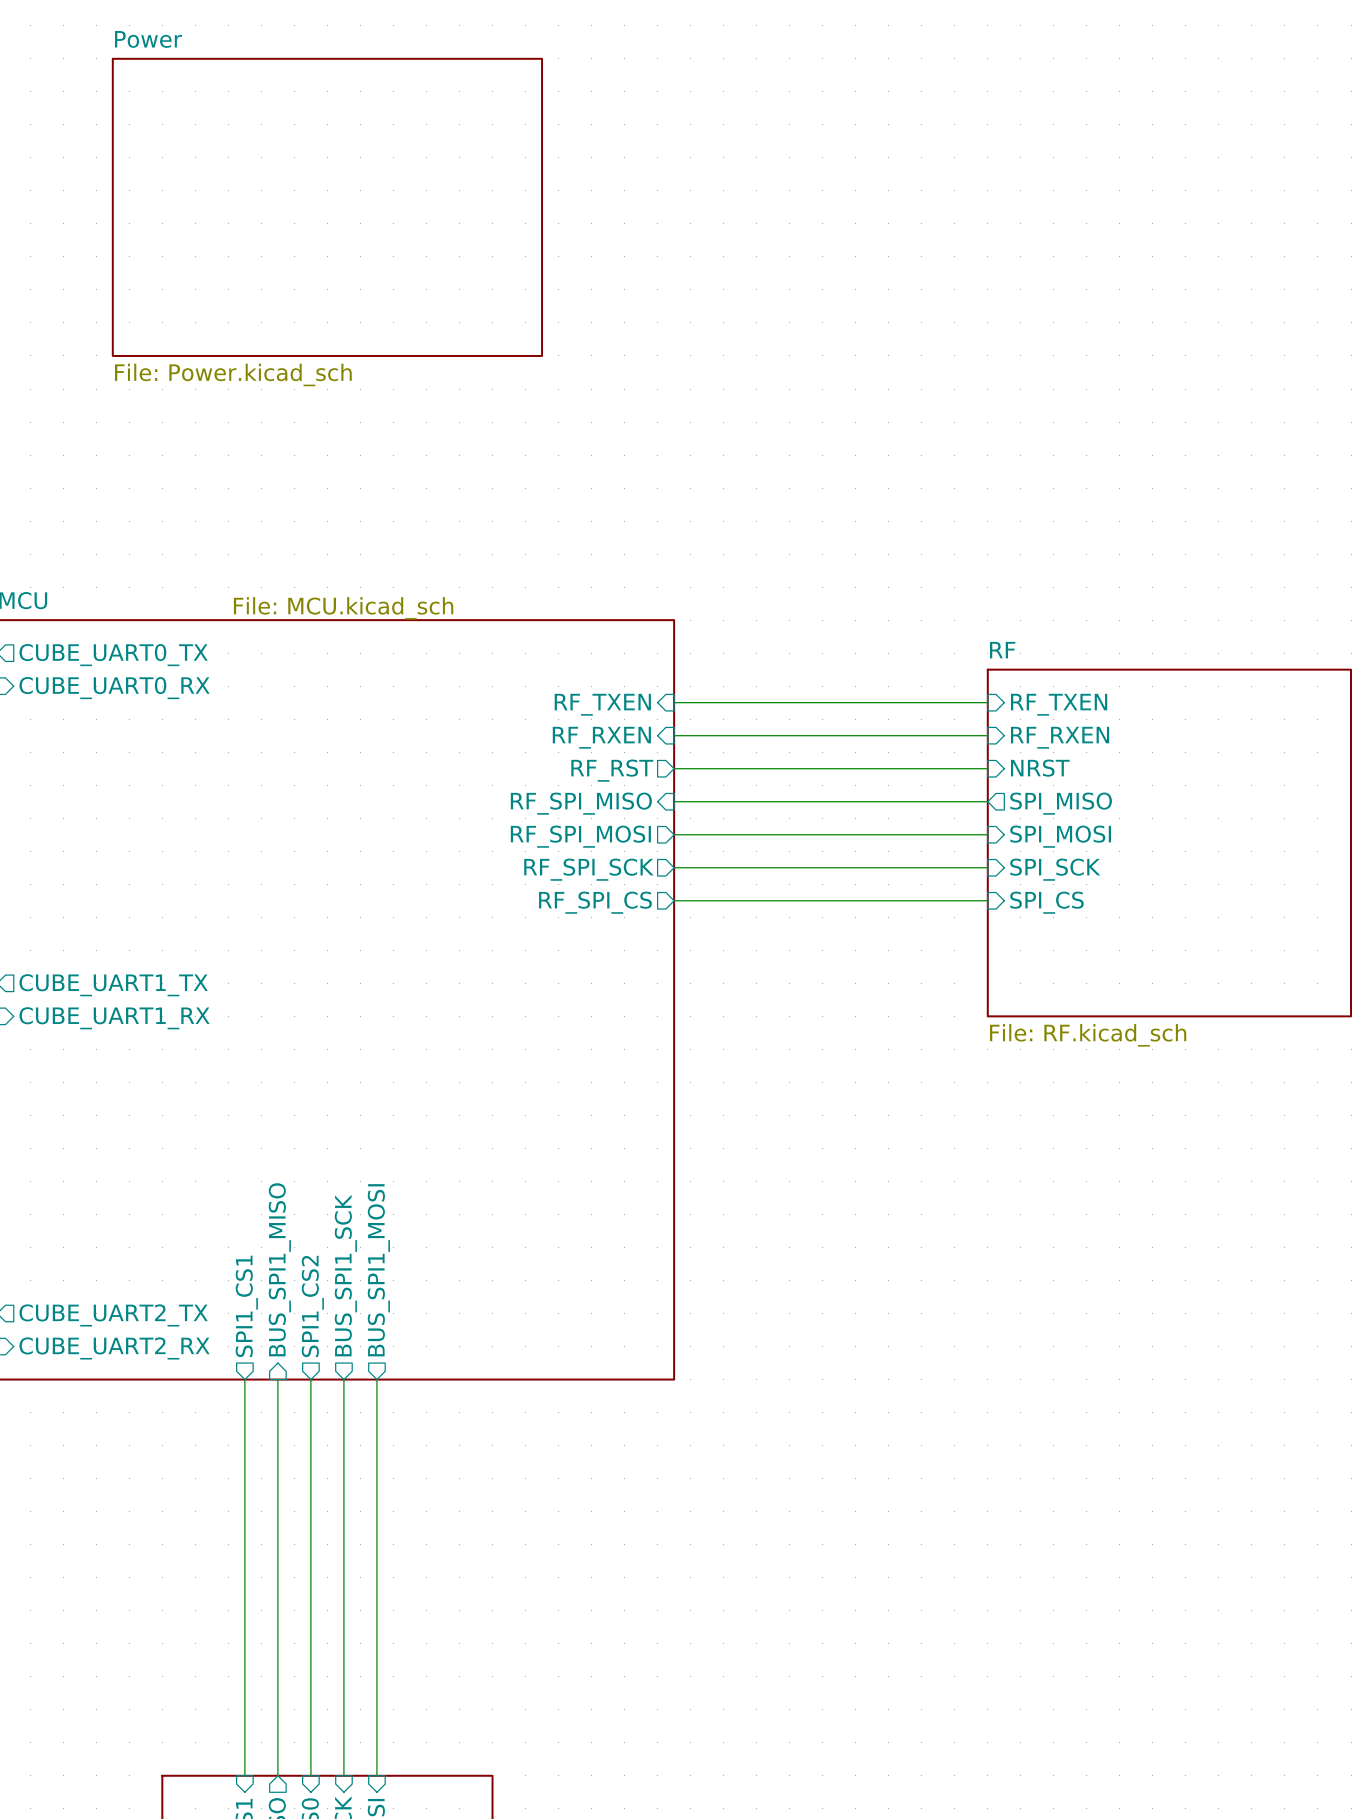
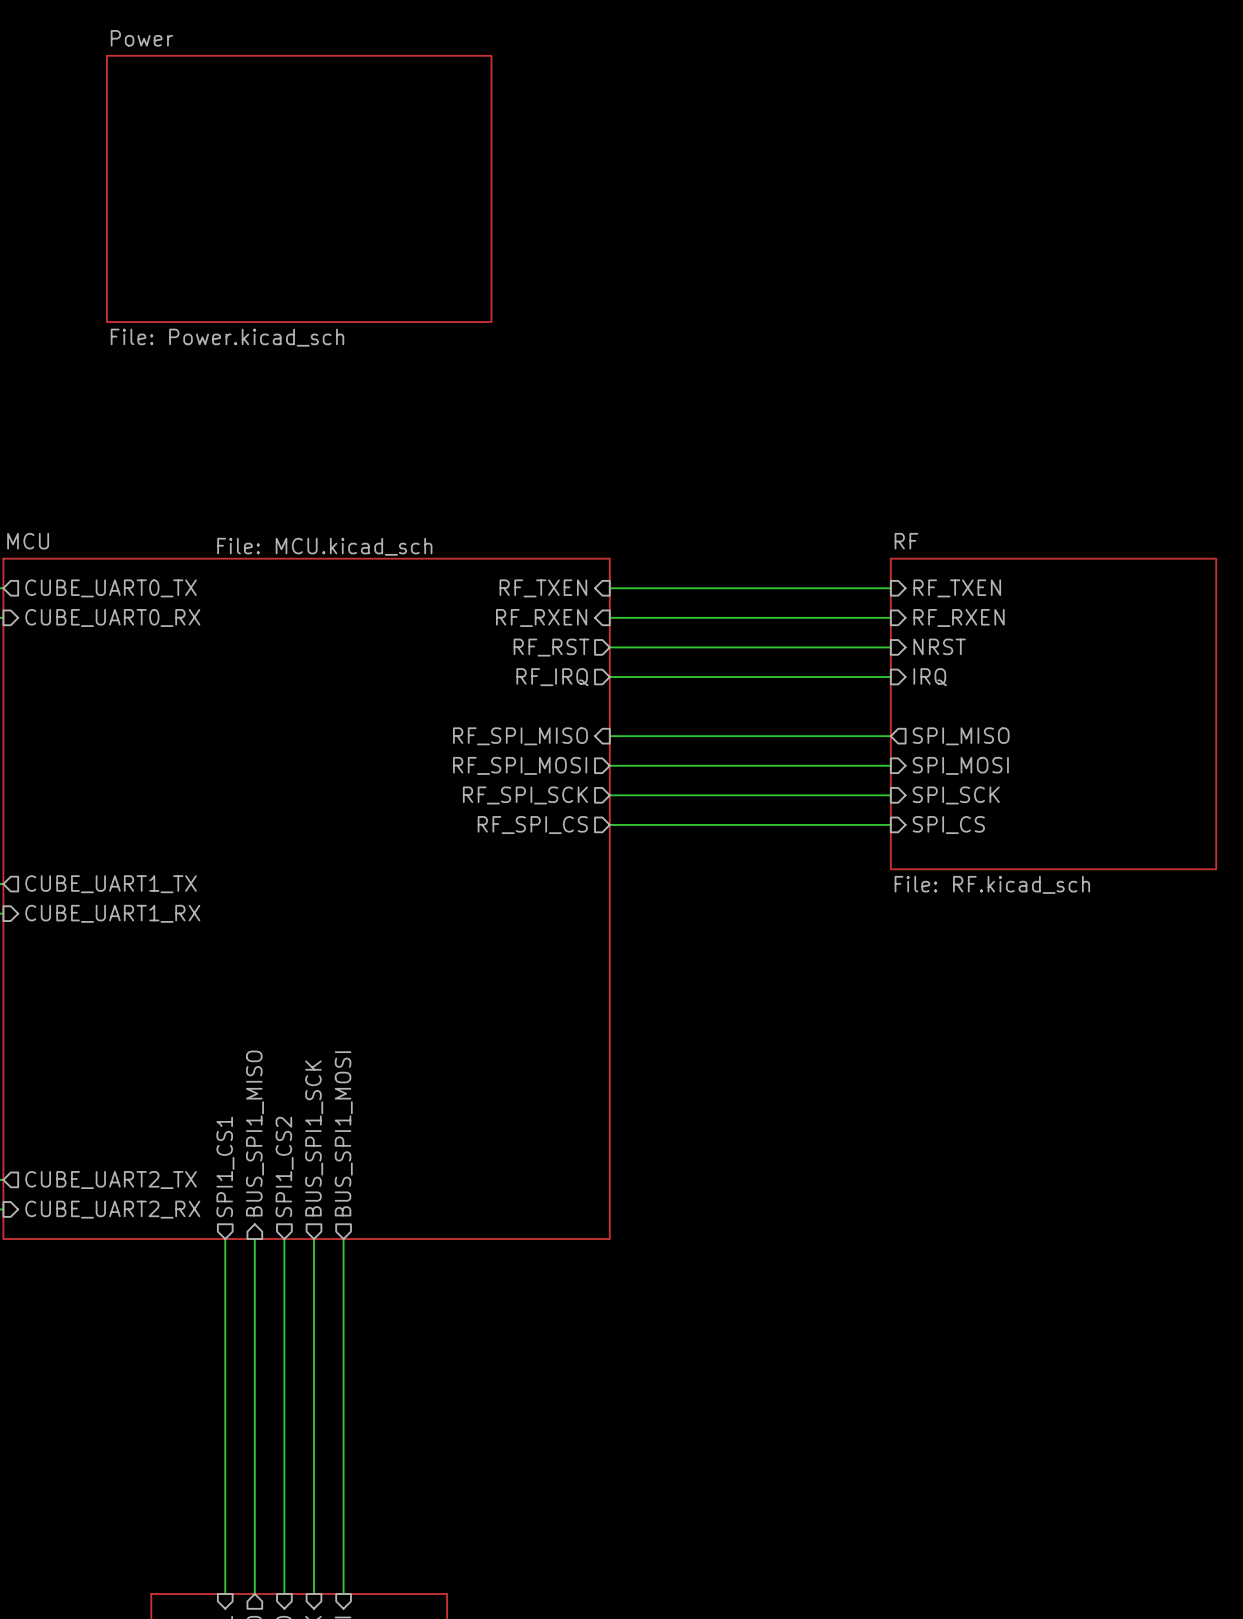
wire: none -> (609, 588) (890, 588)
wire: (674, 702) (987, 702) -> (609, 617) (890, 617)
sheet pin position: RF_TXEN (602, 704) -> RF_TXEN (543, 588)
sheet pin position: RF_TXEN (1059, 704) -> RF_TXEN (957, 588)
wire: (674, 735) (987, 735) -> (609, 677) (890, 677)
sheet pin position: RF_RXEN (601, 737) -> RF_RXEN (541, 617)
sheet pin position: RF_RXEN (1060, 737) -> RF_RXEN (959, 617)
sheet pin: none -> IRQ (930, 677)
sheet pin: none -> RF_IRQ (552, 677)
wire: (674, 768) (987, 768) -> (609, 647) (890, 647)
sheet pin position: NRST (1040, 768) -> NRST (939, 646)
sheet pin position: RF_RST (612, 770) -> RF_RST (551, 647)
wire: (674, 801) (987, 801) -> (609, 736) (890, 736)
sheet pin position: RF_SPI_MISO (581, 803) -> RF_SPI_MISO (520, 736)
sheet pin position: SPI_MISO (1061, 803) -> SPI_MISO (961, 736)
wire: (674, 834) (987, 834) -> (609, 795) (890, 795)
sheet pin position: RF_SPI_MOSI (580, 836) -> RF_SPI_MOSI (520, 765)
sheet pin position: SPI_MOSI (1060, 836) -> SPI_MOSI (960, 765)
sheet RF position: (1169, 843) -> (1053, 713)
wire: (674, 867) (987, 867) -> (609, 765) (890, 765)
sheet pin position: RF_SPI_SCK (588, 869) -> RF_SPI_SCK (525, 795)
sheet pin position: SPI_SCK (1055, 869) -> SPI_SCK (956, 795)
wire: (674, 900) (987, 900) -> (609, 824) (890, 824)
sheet pin position: RF_SPI_CS (595, 902) -> RF_SPI_CS (532, 825)
sheet pin position: SPI_CS (1046, 902) -> SPI_CS (948, 825)

